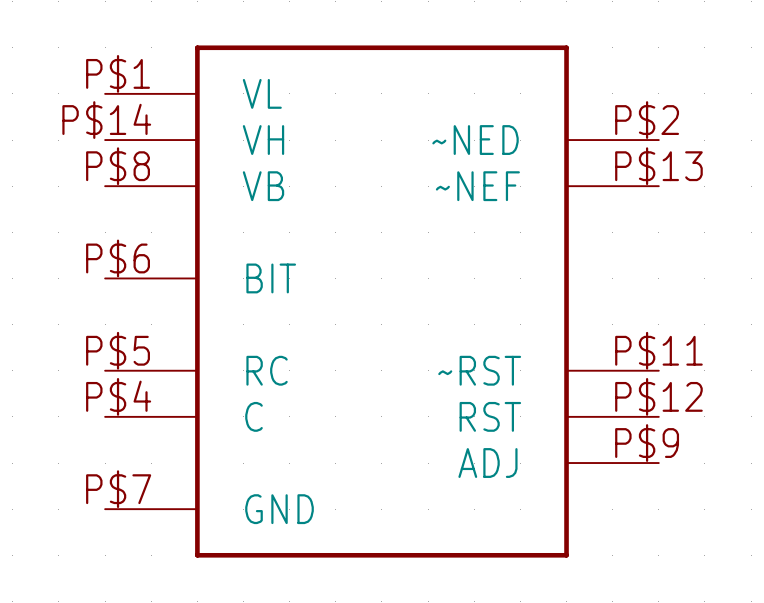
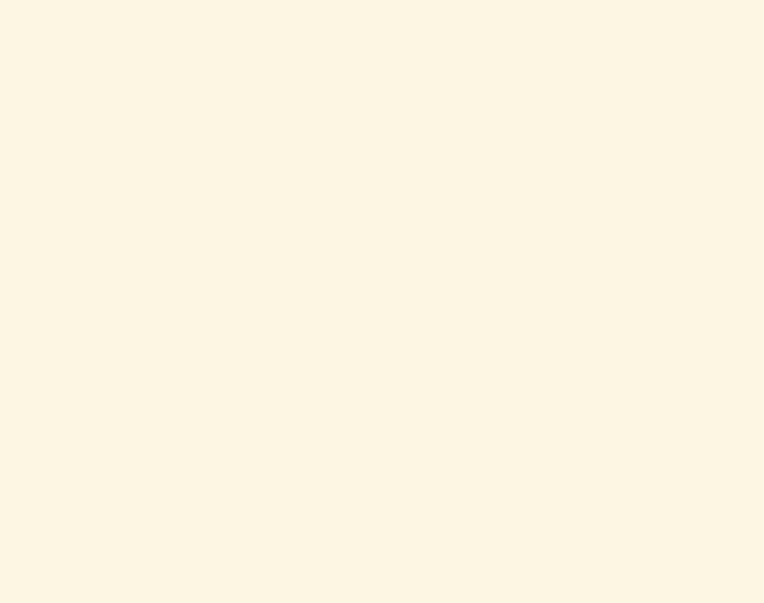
part: (381, 301) -> none

